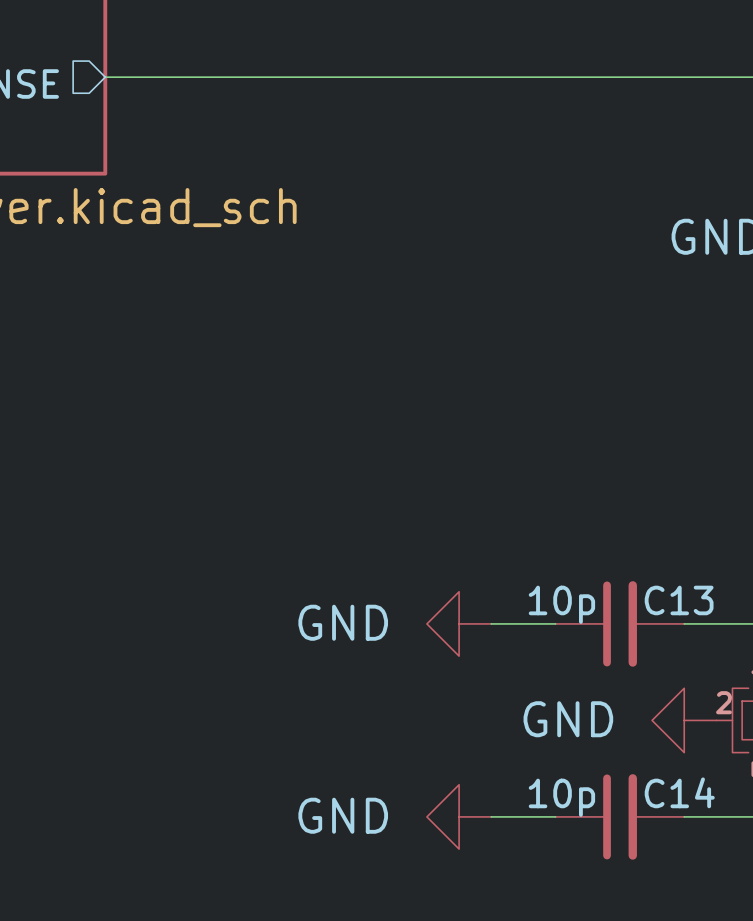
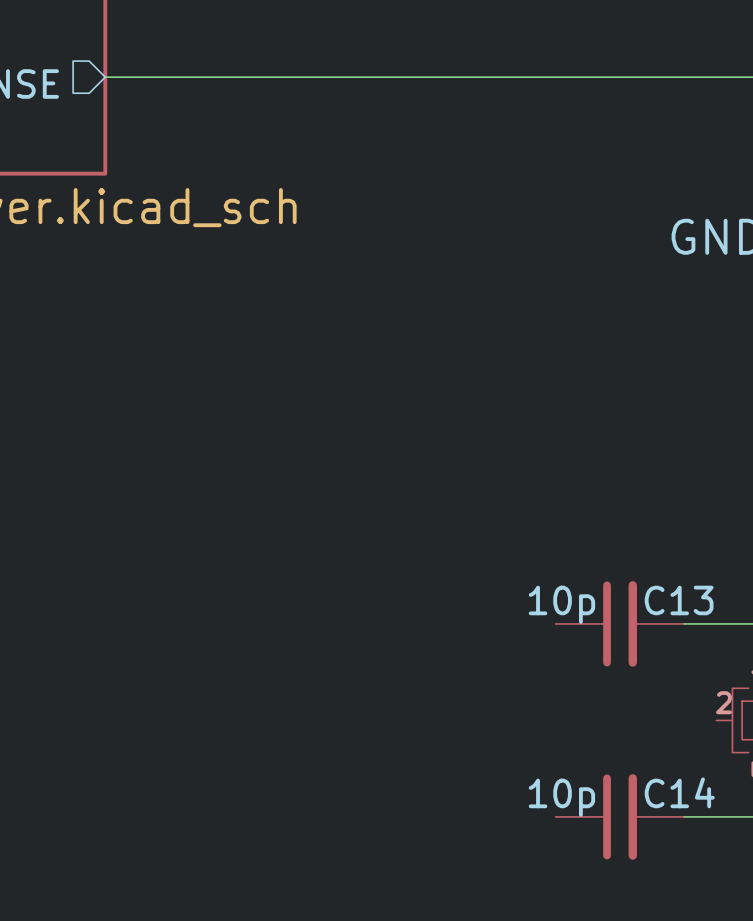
power symbol: GND (459, 623) -> none
wire: (491, 623) (555, 623) -> none
power symbol: GND (684, 720) -> none
power symbol: GND (459, 816) -> none
wire: (491, 816) (555, 816) -> none

